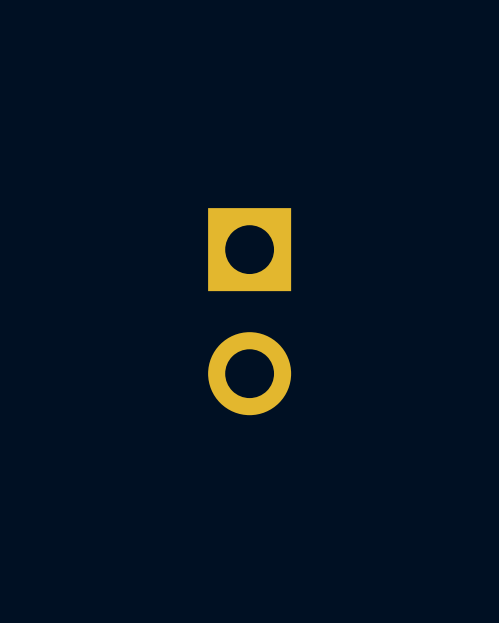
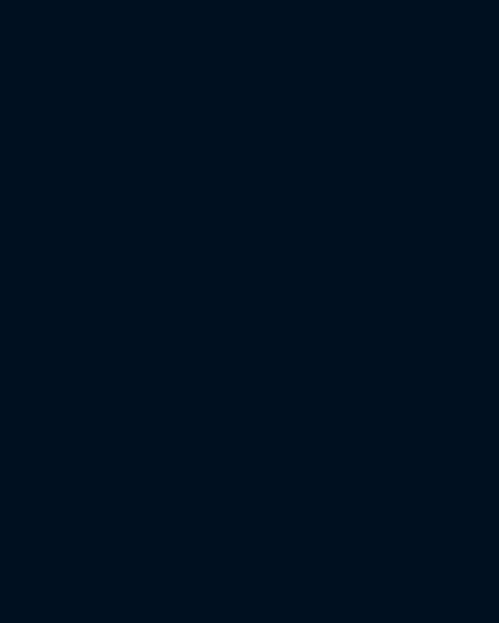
part: (249, 311) -> none

